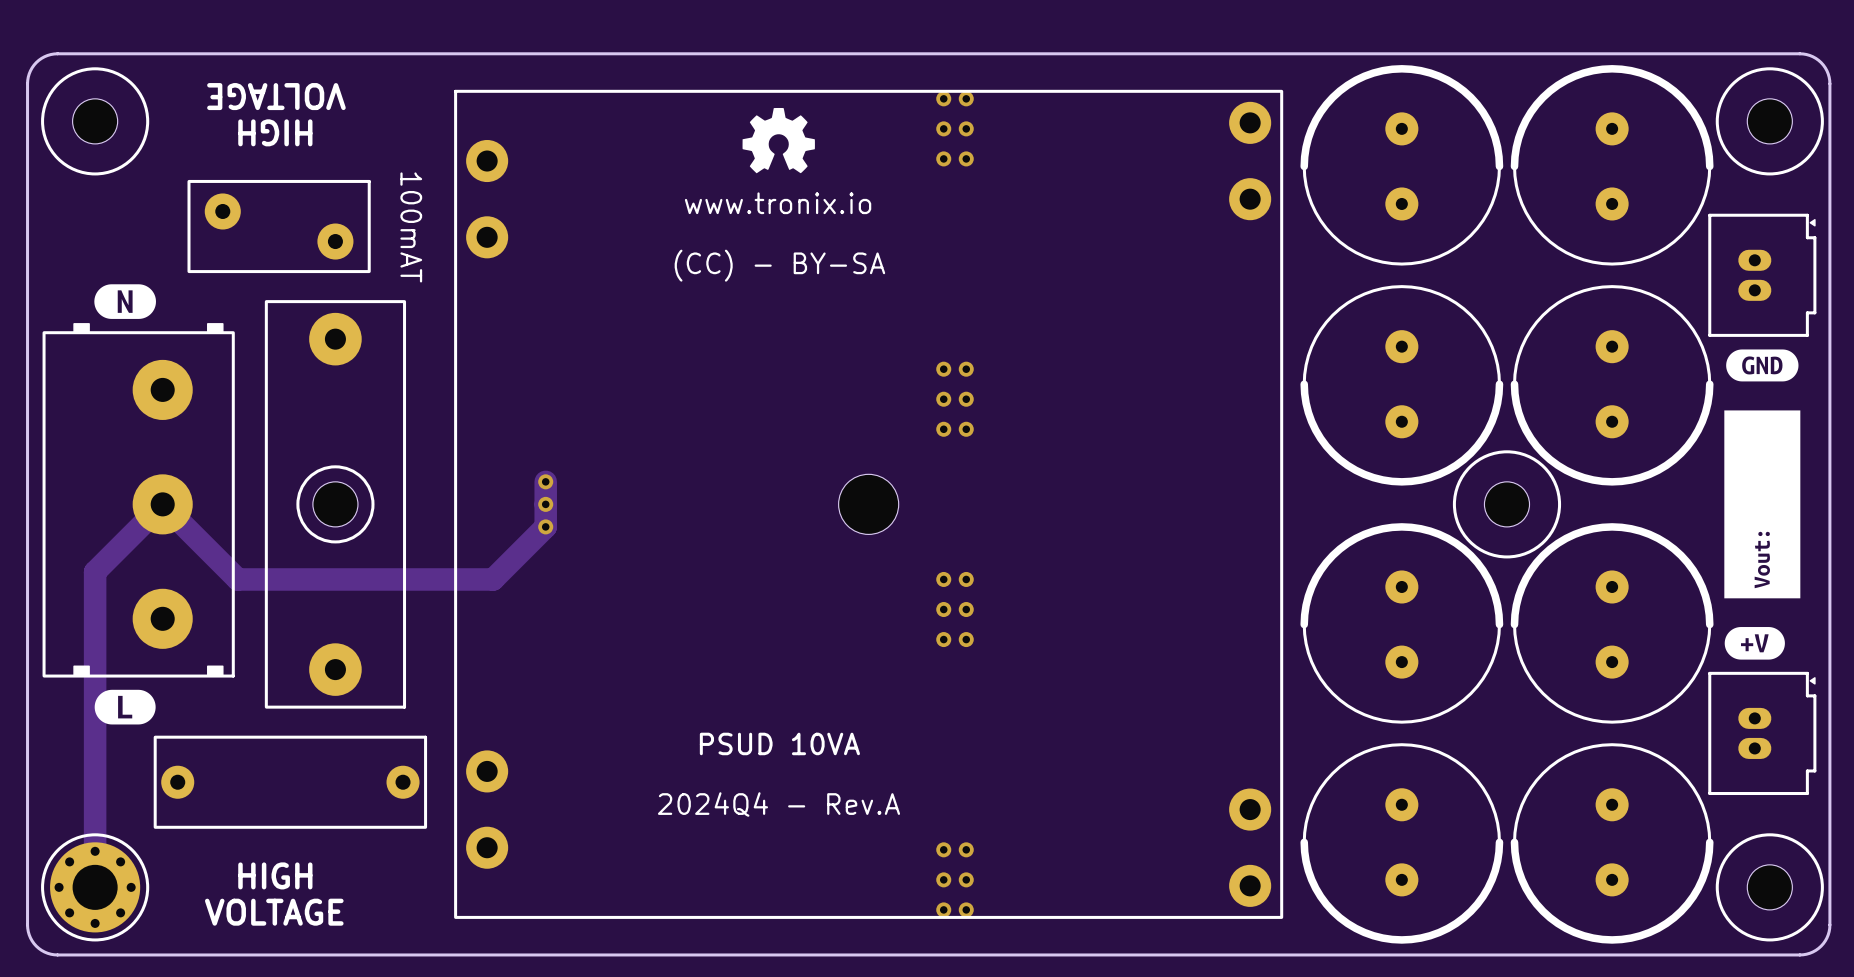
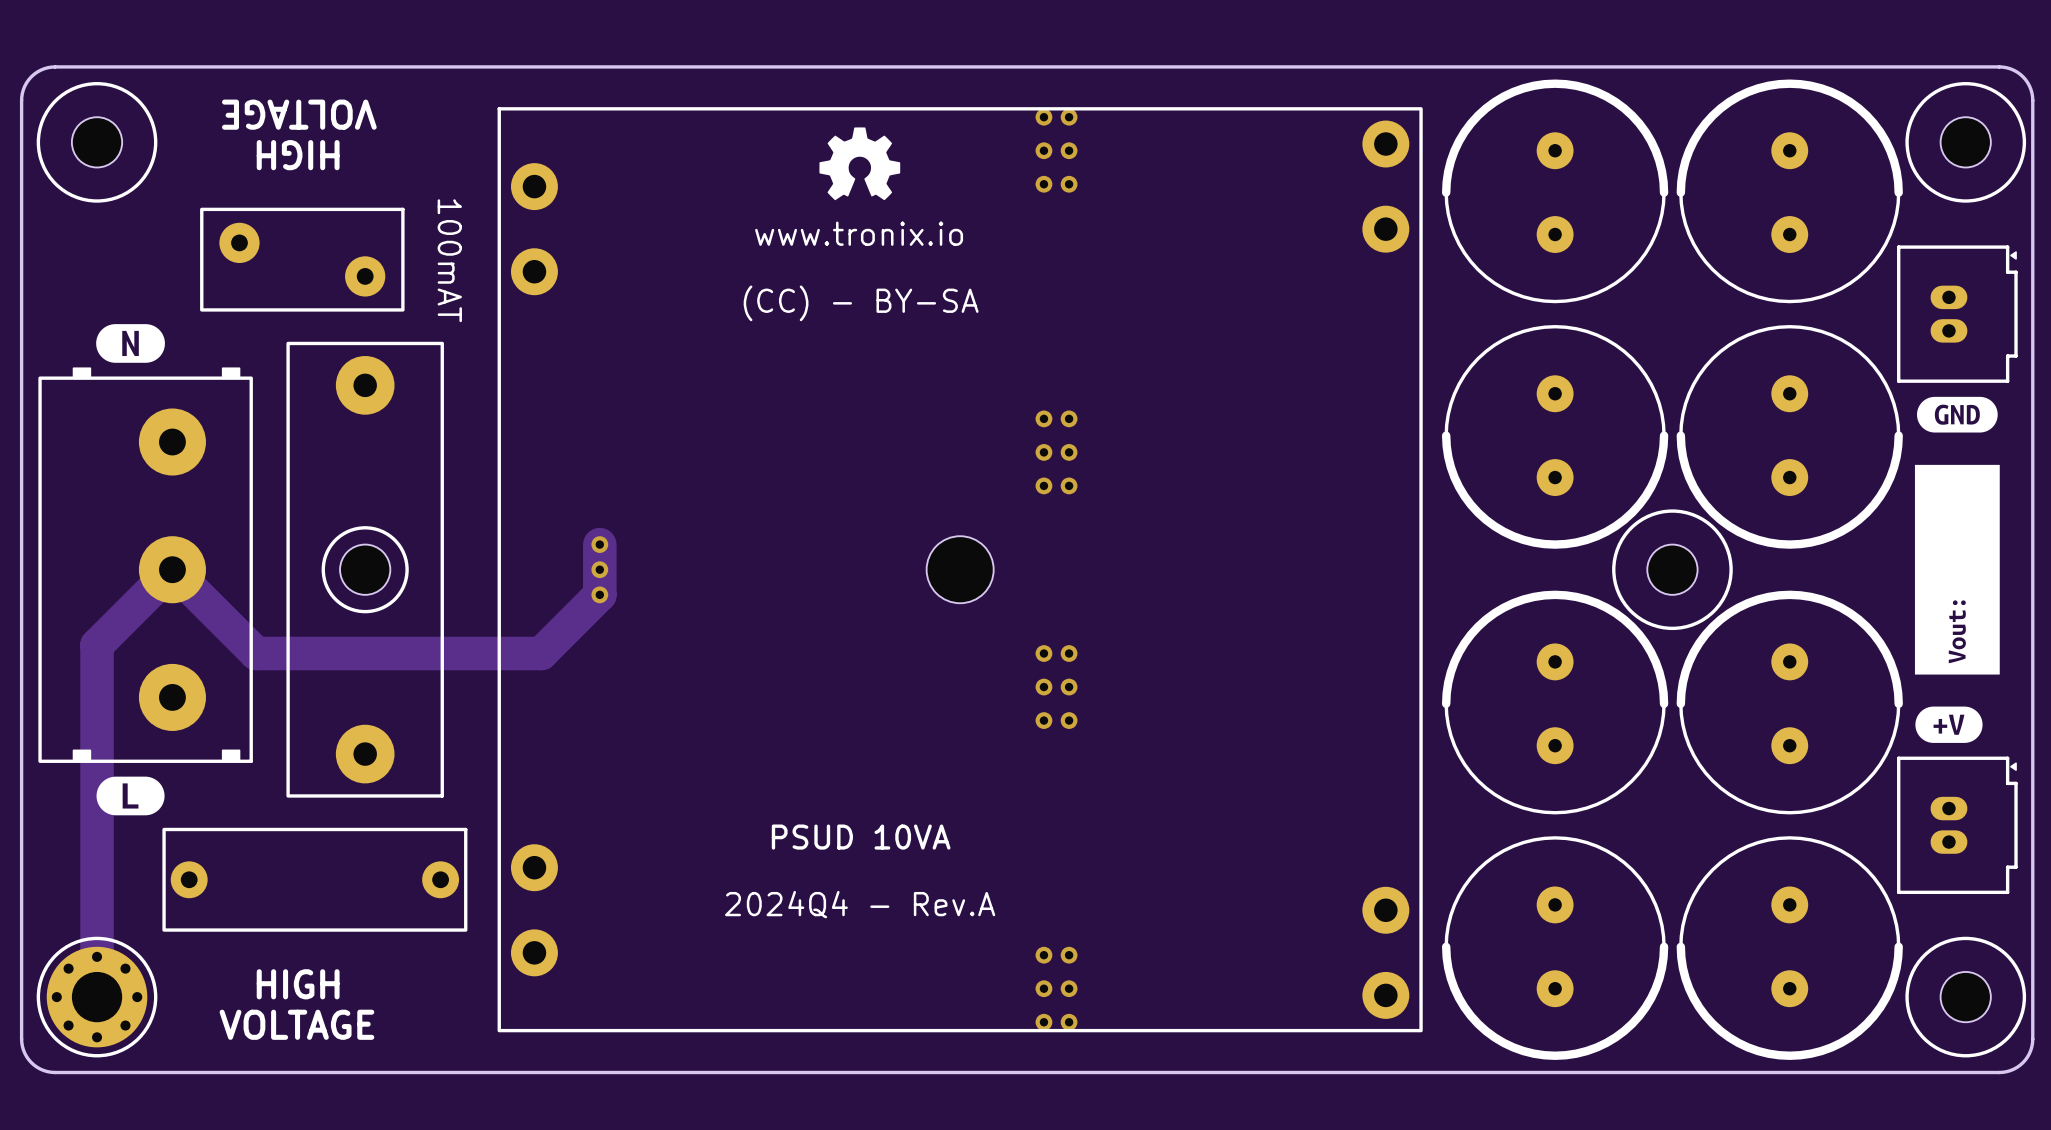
track width: thin (545, 481) (545, 526) (493, 579) (237, 579) (162, 504) (95, 571) (95, 851) -> thick (599, 544) (599, 594) (541, 653) (256, 653) (172, 569) (97, 645) (97, 956)

